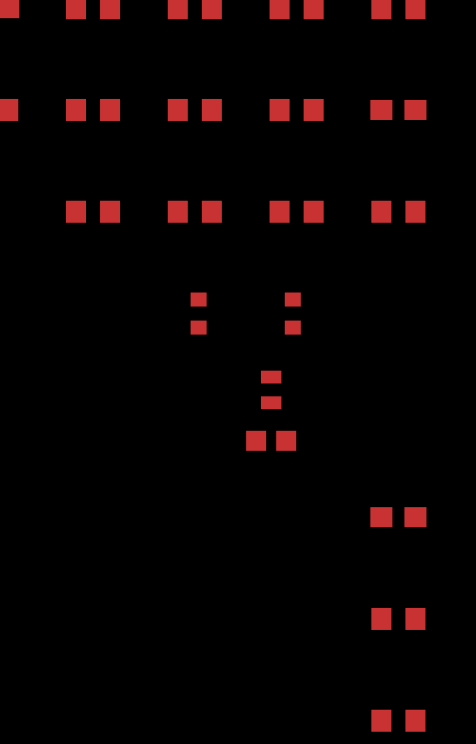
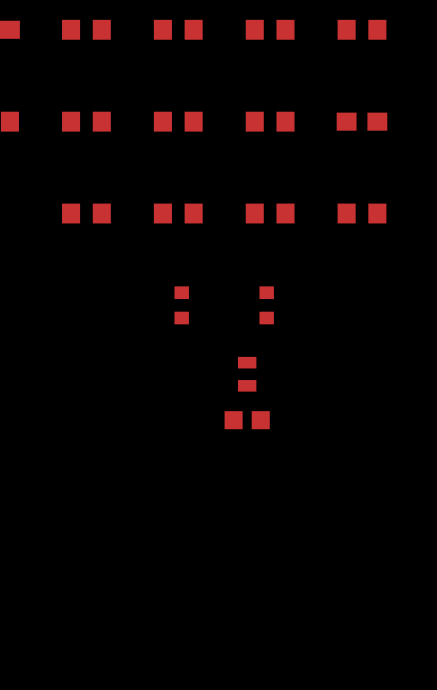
part: (398, 517) -> none
part: (398, 618) -> none
part: (398, 720) -> none

